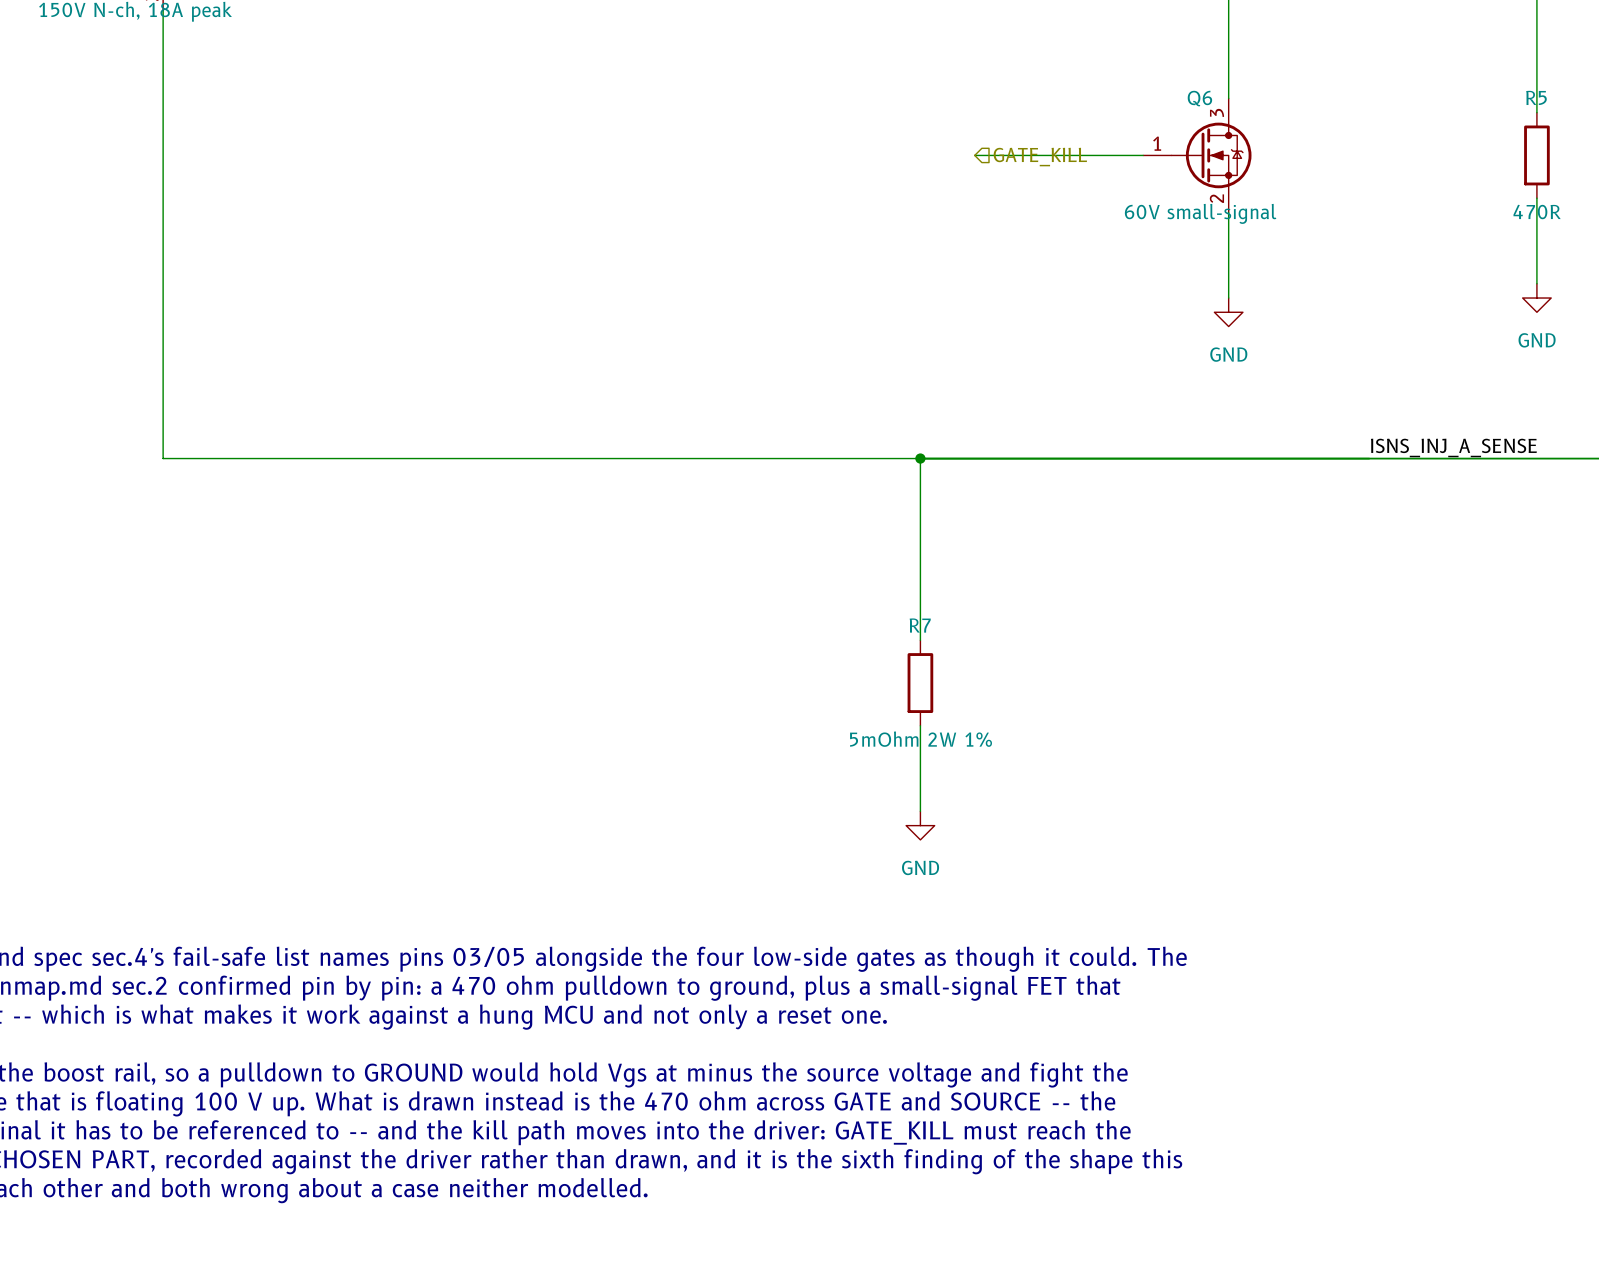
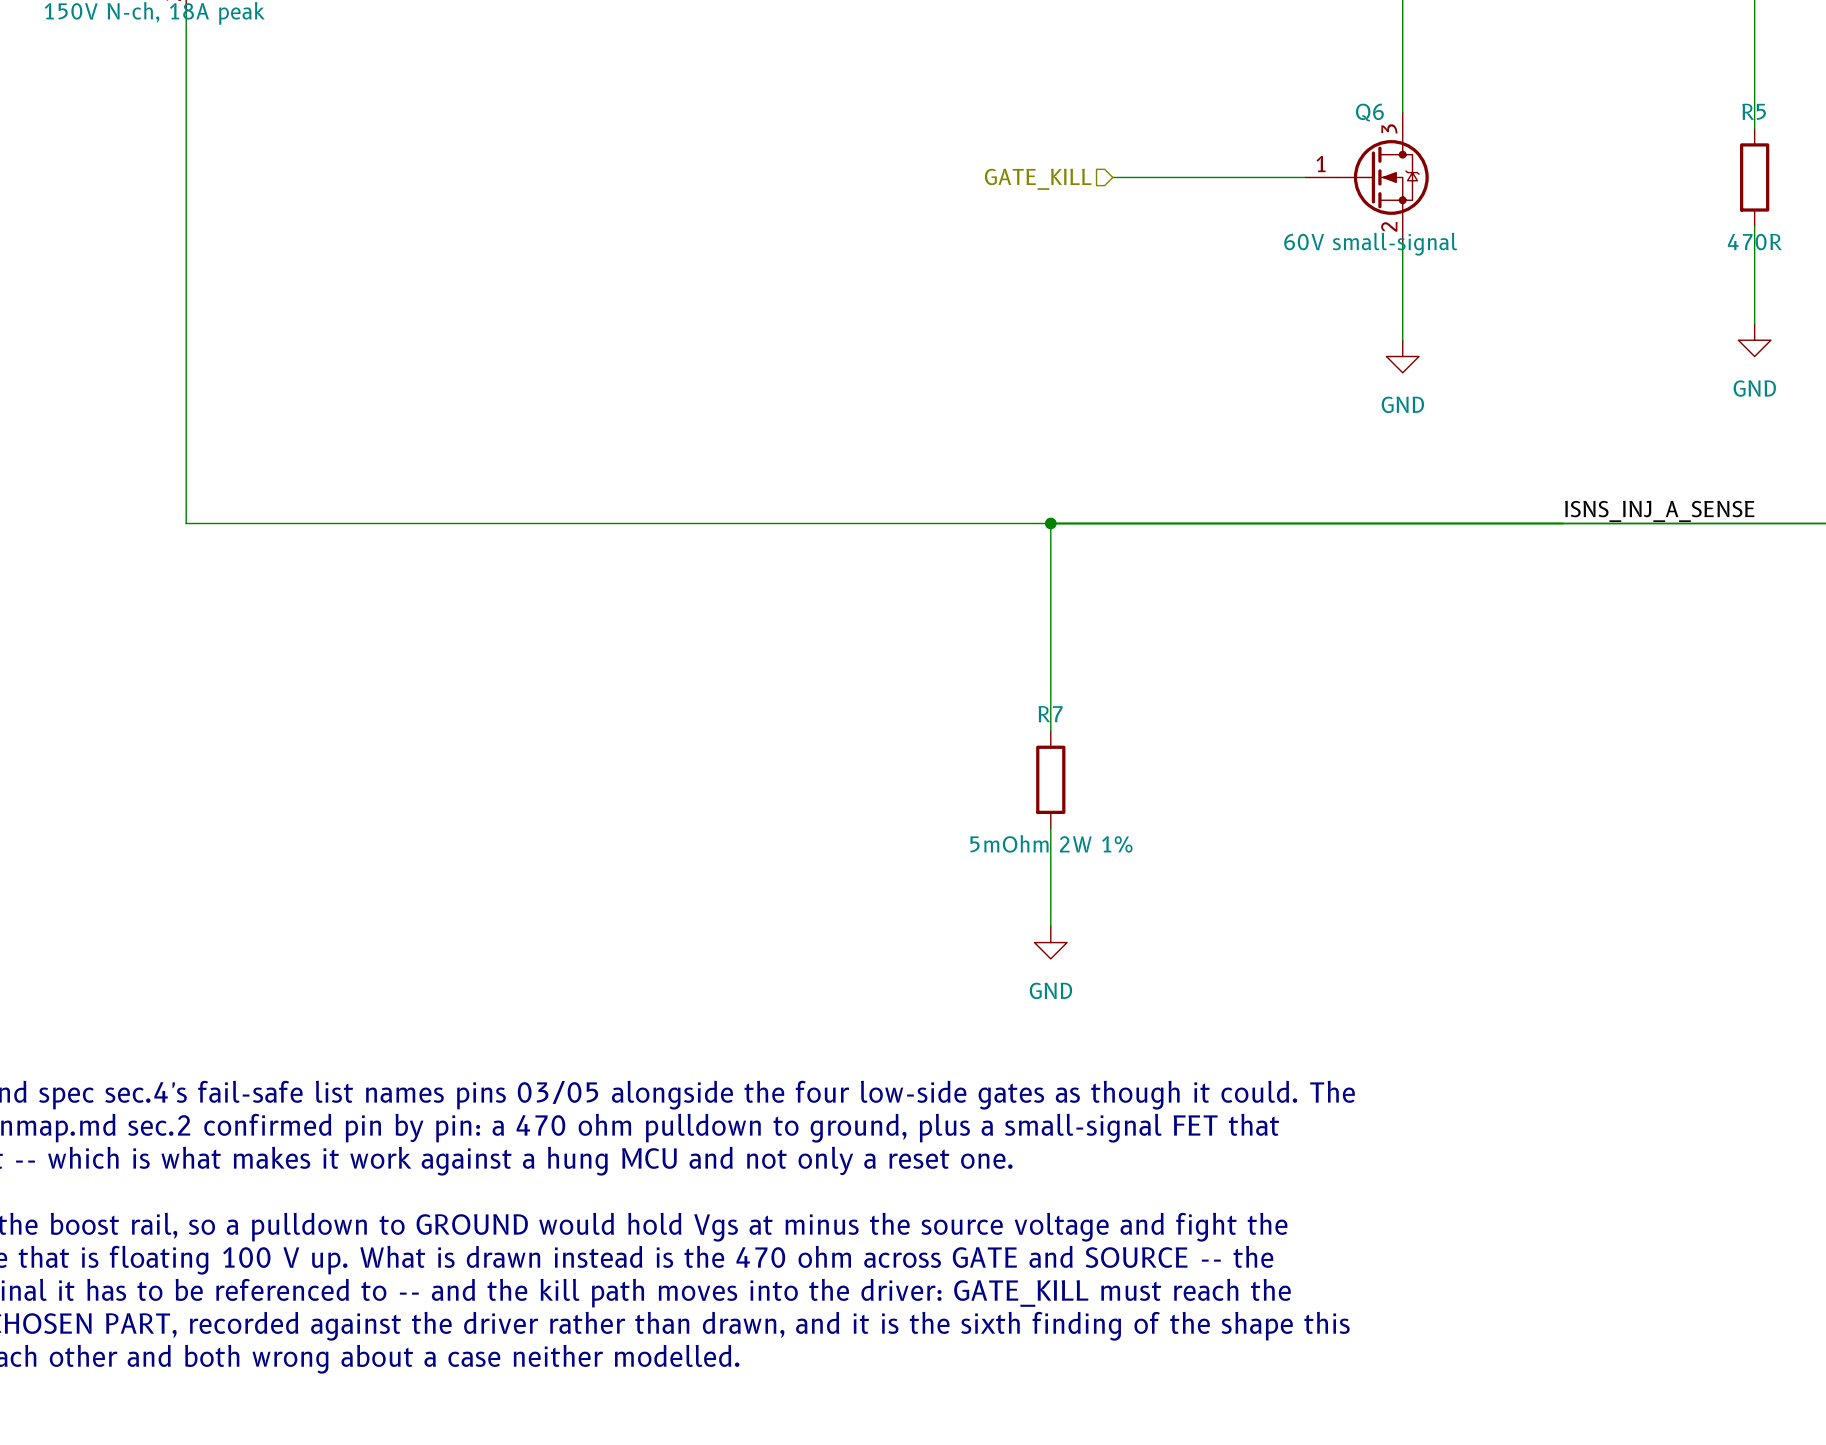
hierarchical label rotation: 0° (1040, 157) -> 180° (1038, 179)
hierarchical label position: GATE_KILL (1040, 157) -> GATE_KILL (1038, 179)

